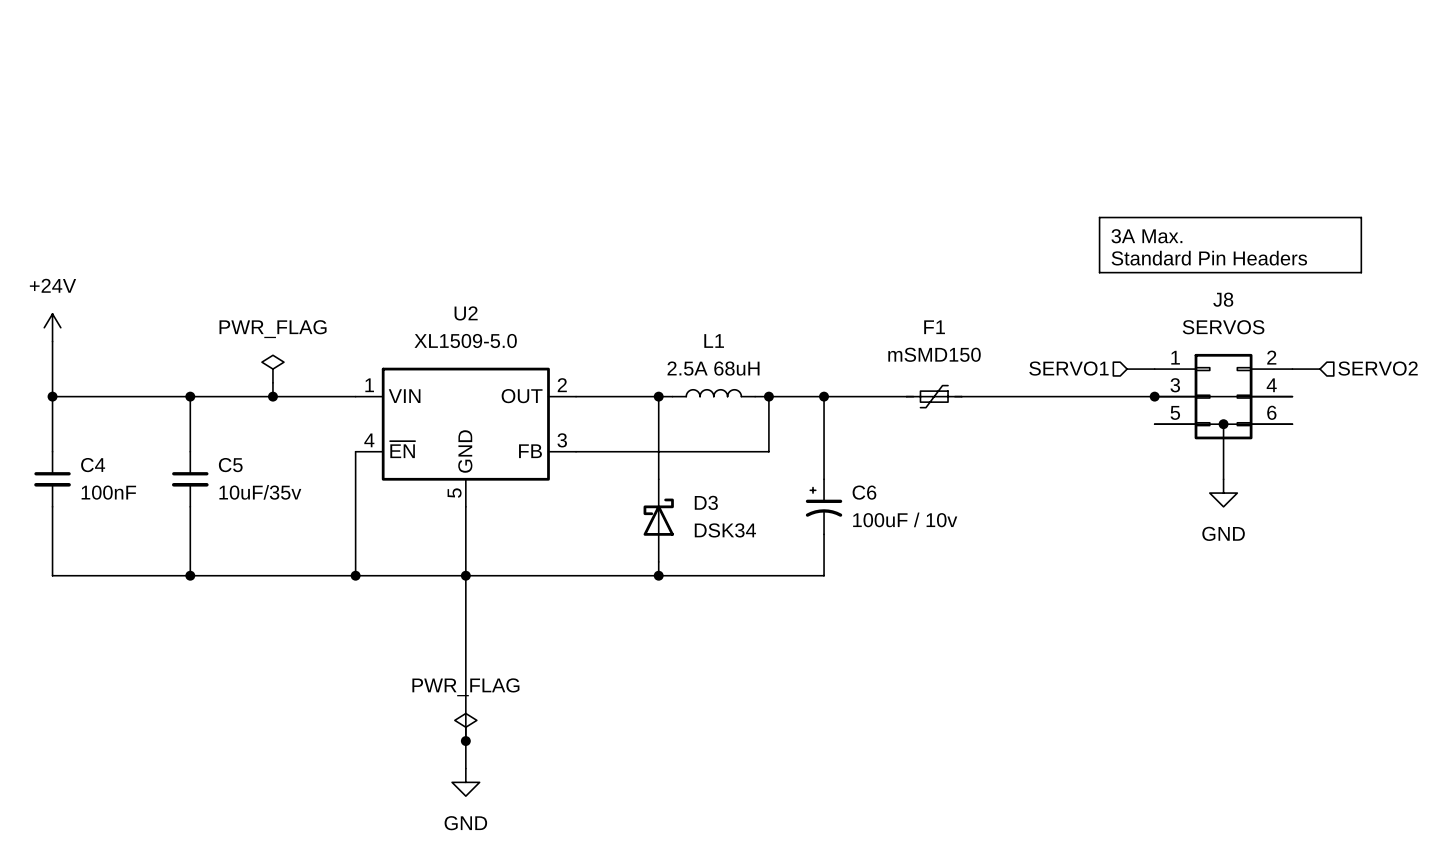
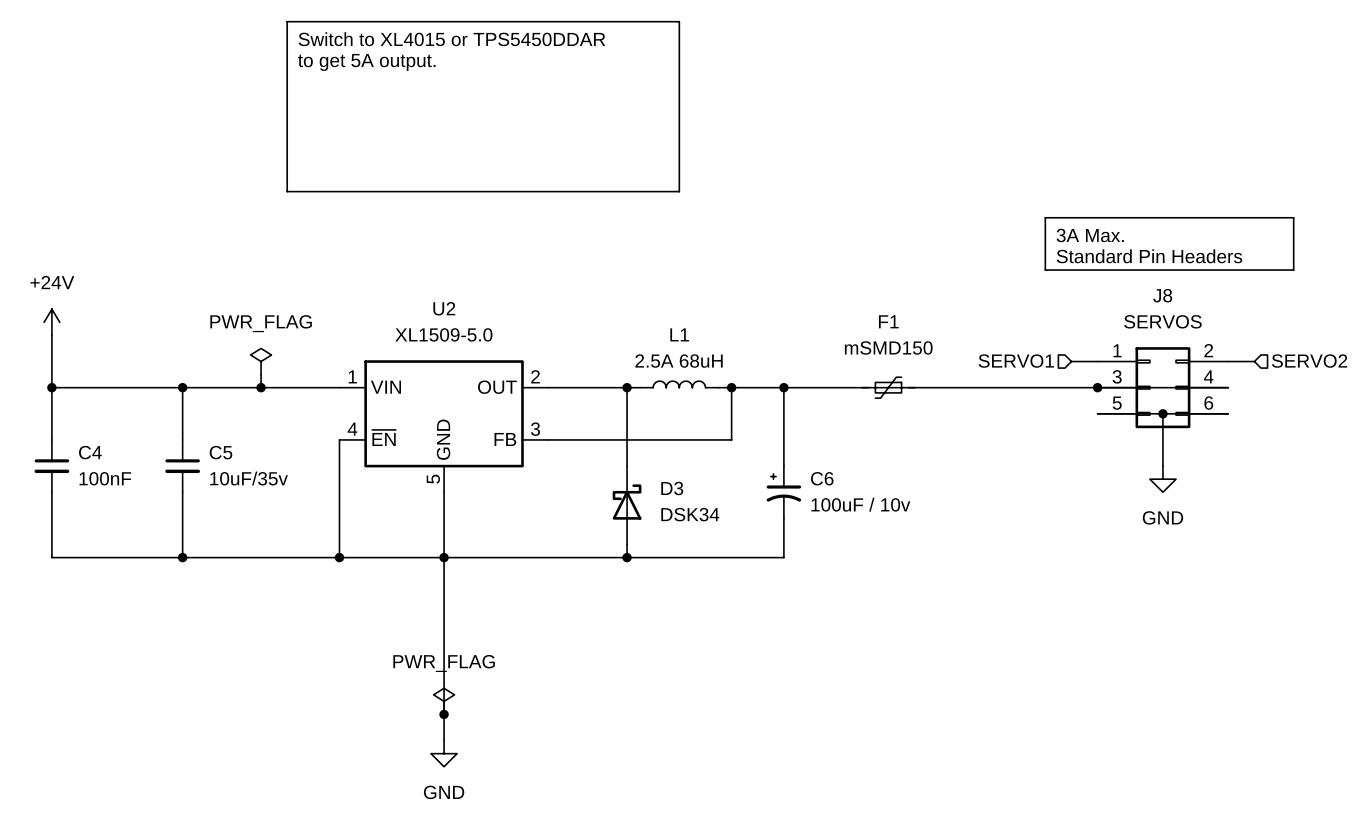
line: none -> (287, 21) (679, 21) (679, 191) (287, 191) (287, 21)
text: none -> Switch to XL4015 or TPS5450DDAR (451, 39)
text: none -> to get 5A output. (366, 62)

